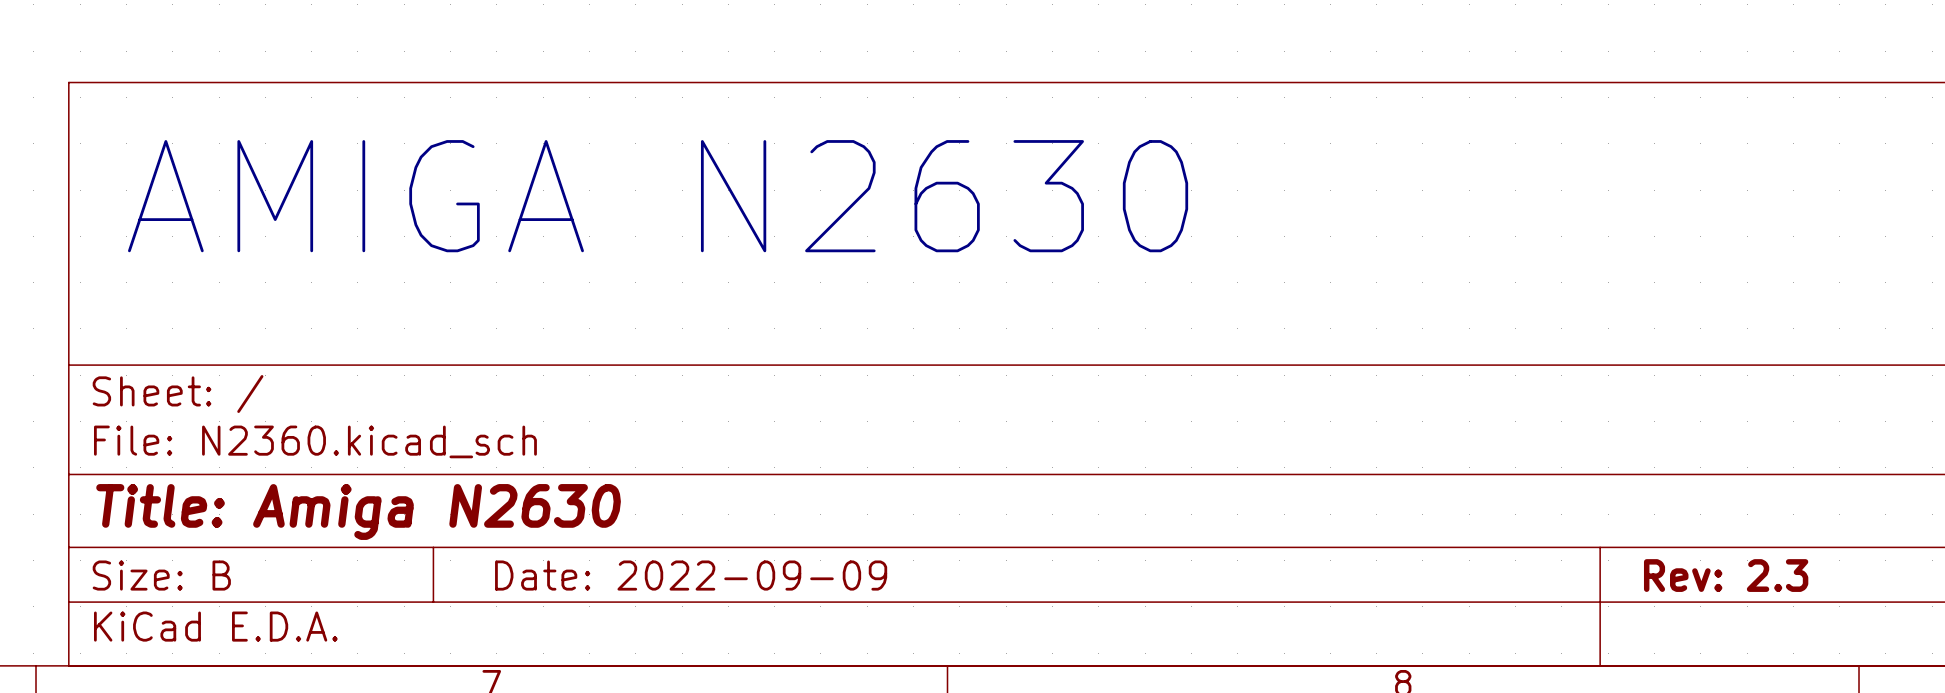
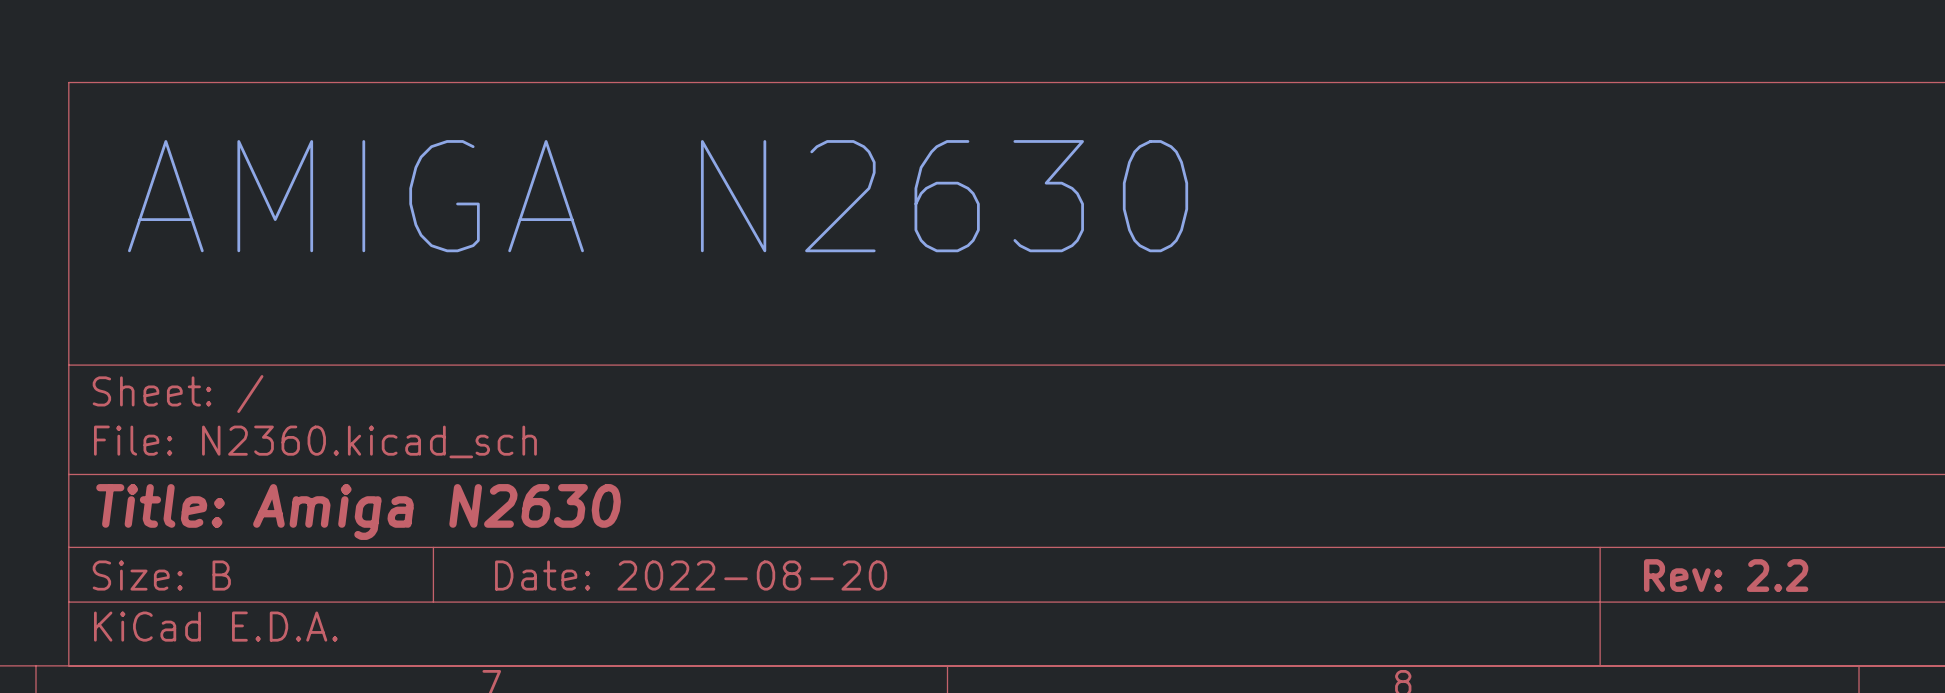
title block: Date: 2022-09-09 (691, 575) -> Date: 2022-08-20 (691, 575)
title block: Rev: 2.3 (1726, 575) -> Rev: 2.2 (1726, 575)

